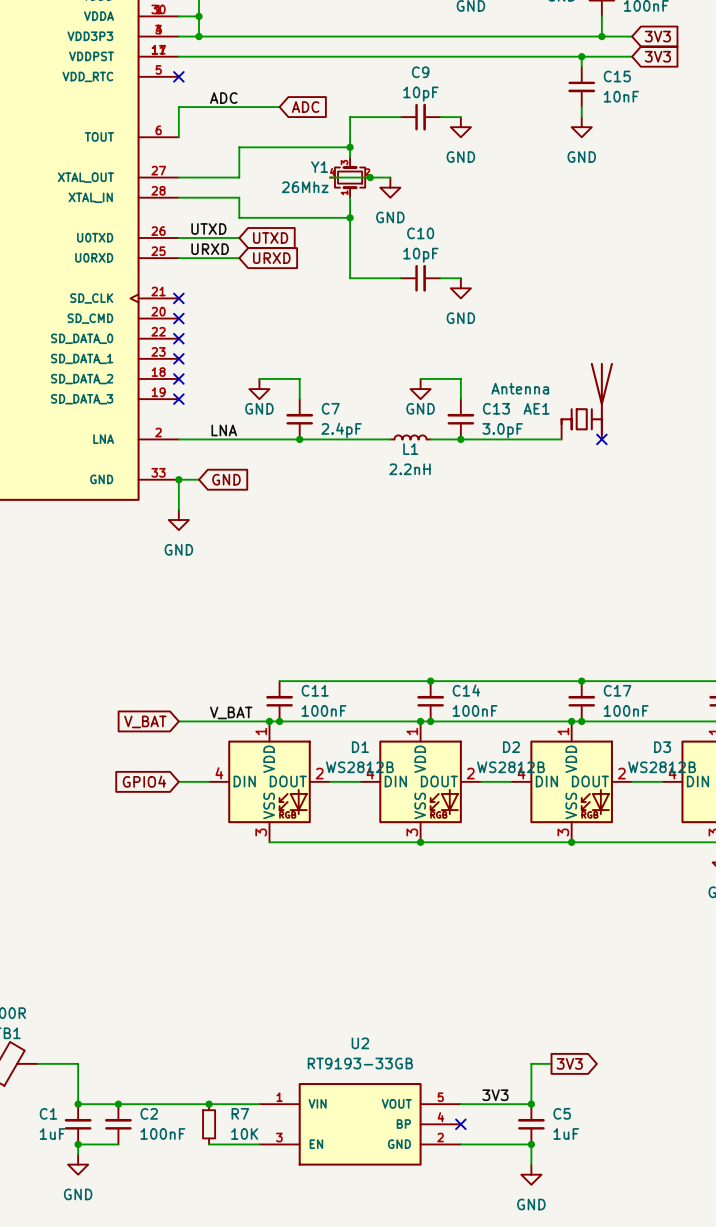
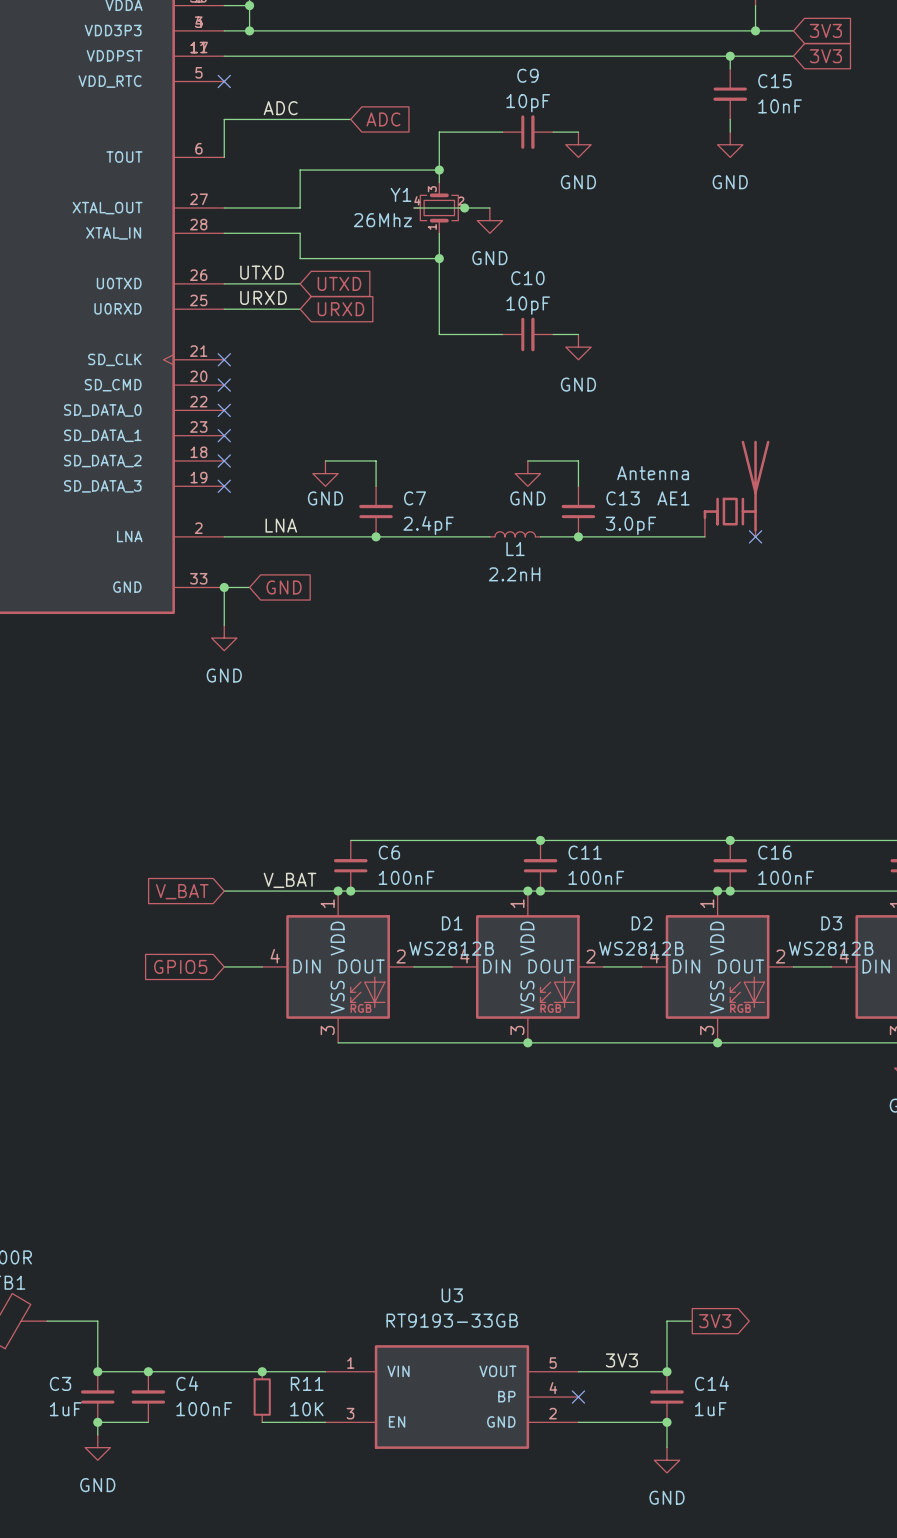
C11 name: C11 (315, 690) -> C6 (389, 852)
C14 name: C14 (466, 690) -> C11 (585, 852)
C17 name: C17 (617, 690) -> C16 (774, 852)
global label: GPIO4 (144, 781) -> GPIO5 (180, 966)
U2 name: U2 (360, 1043) -> U3 (452, 1295)
C1 name: C1 (48, 1113) -> C3 (60, 1383)
C2 name: C2 (149, 1113) -> C4 (187, 1383)
R7 name: R7 (240, 1113) -> R11 (307, 1383)
C5 name: C5 (562, 1113) -> C14 (711, 1383)

